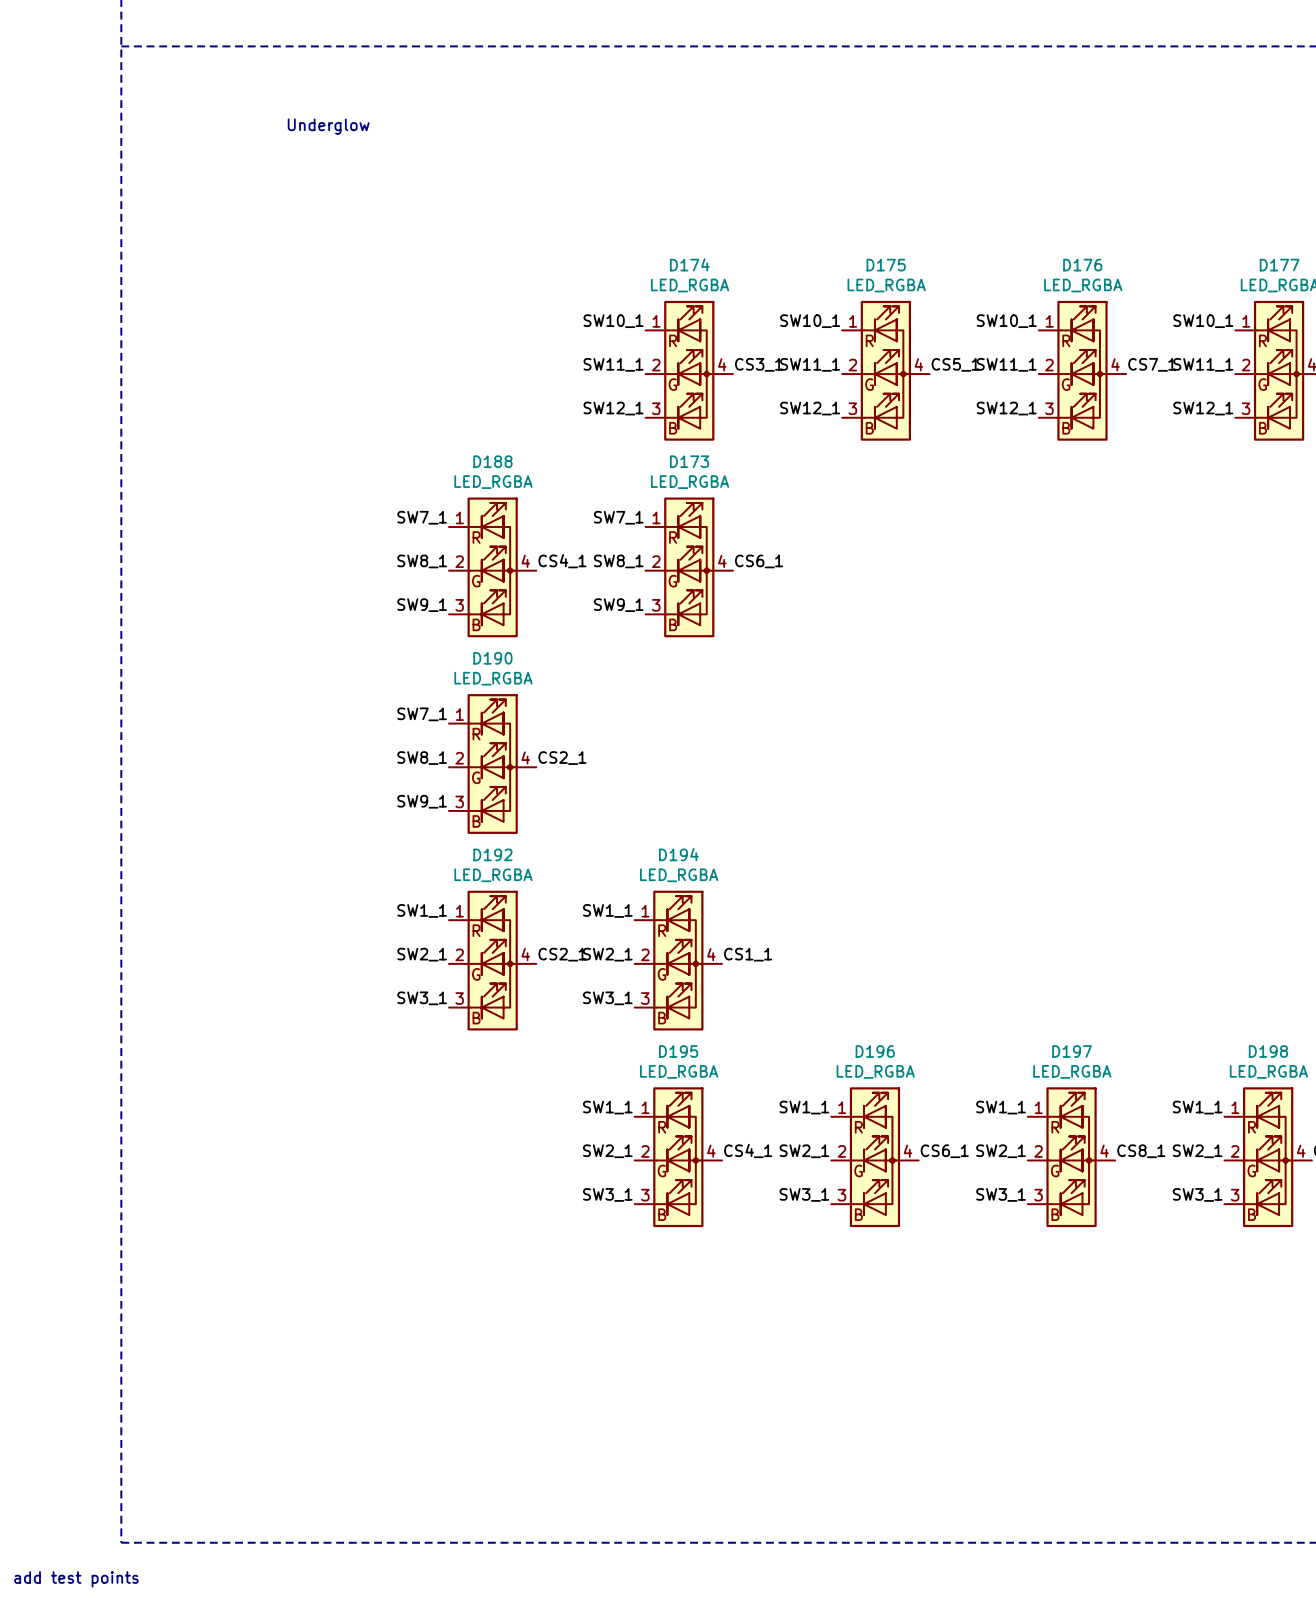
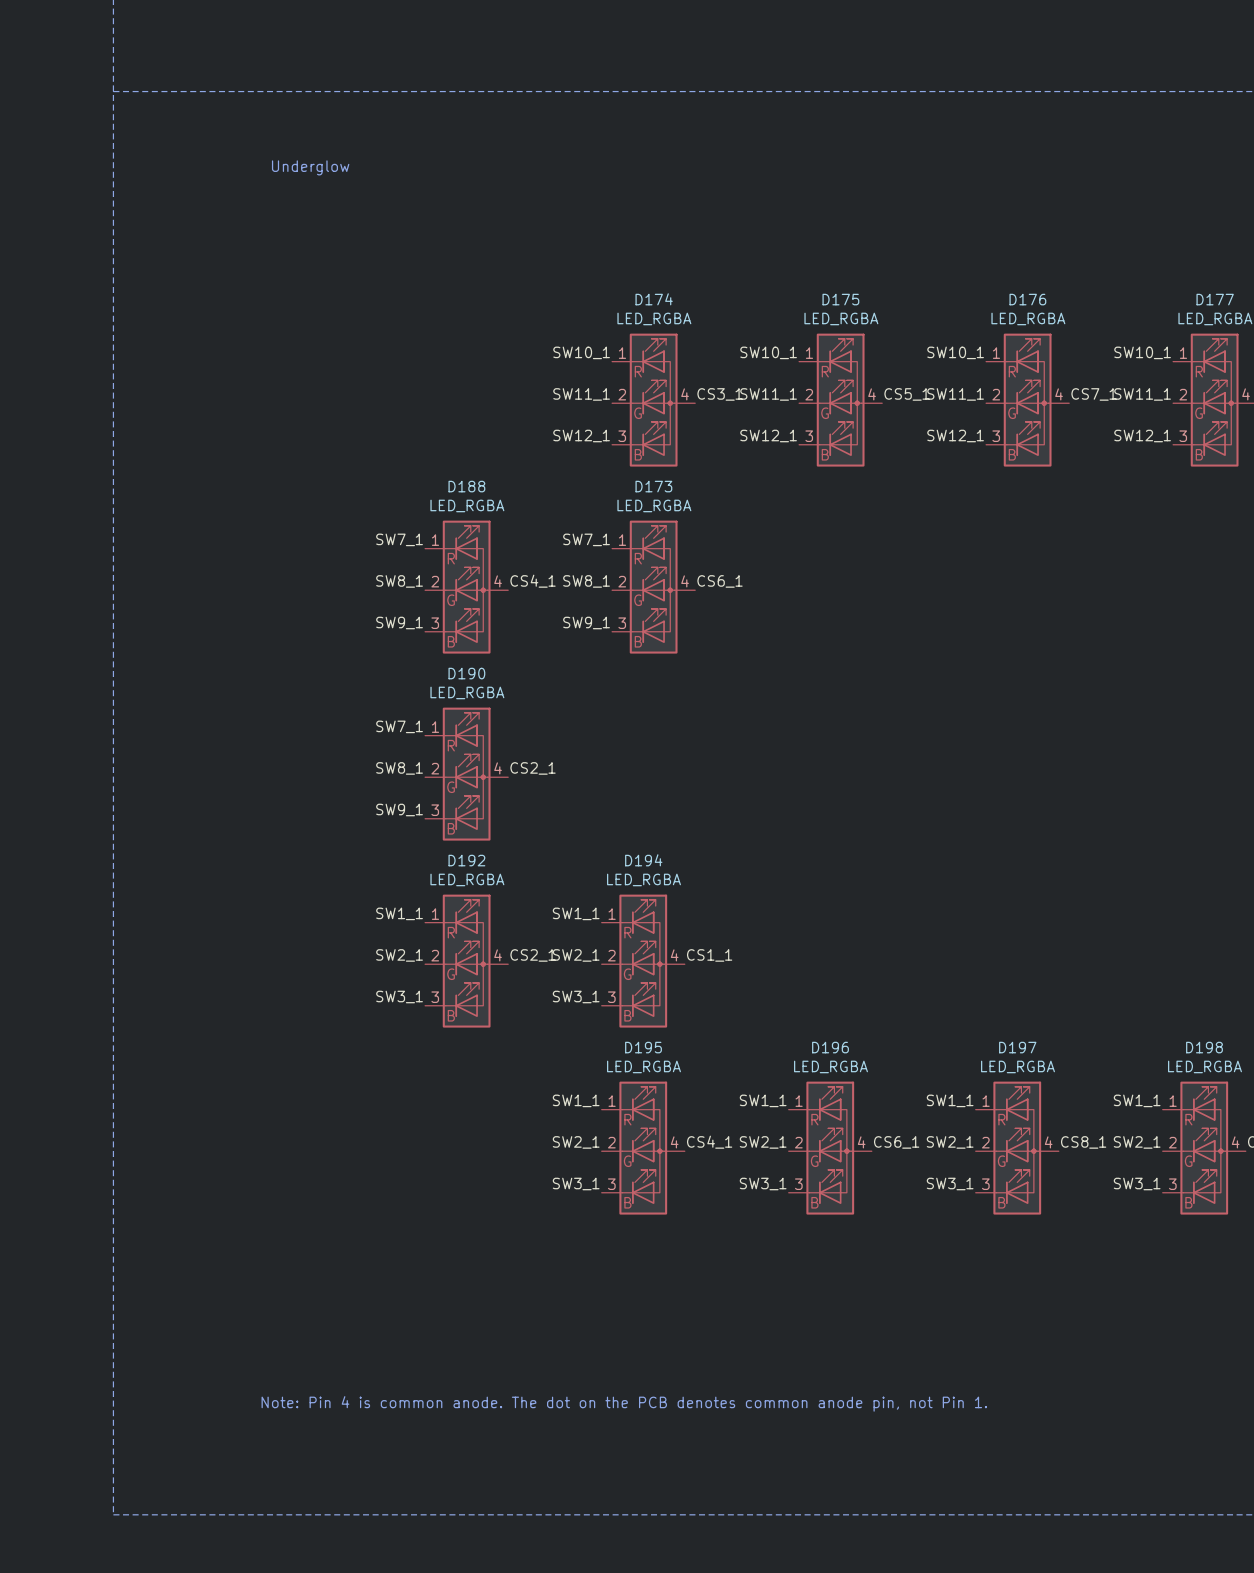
text: none -> Note: Pin 4 is common anode. The dot on the PCB denotes common anode pin, not Pin 1. (624, 1403)
text: add test points (76, 1579) -> none

